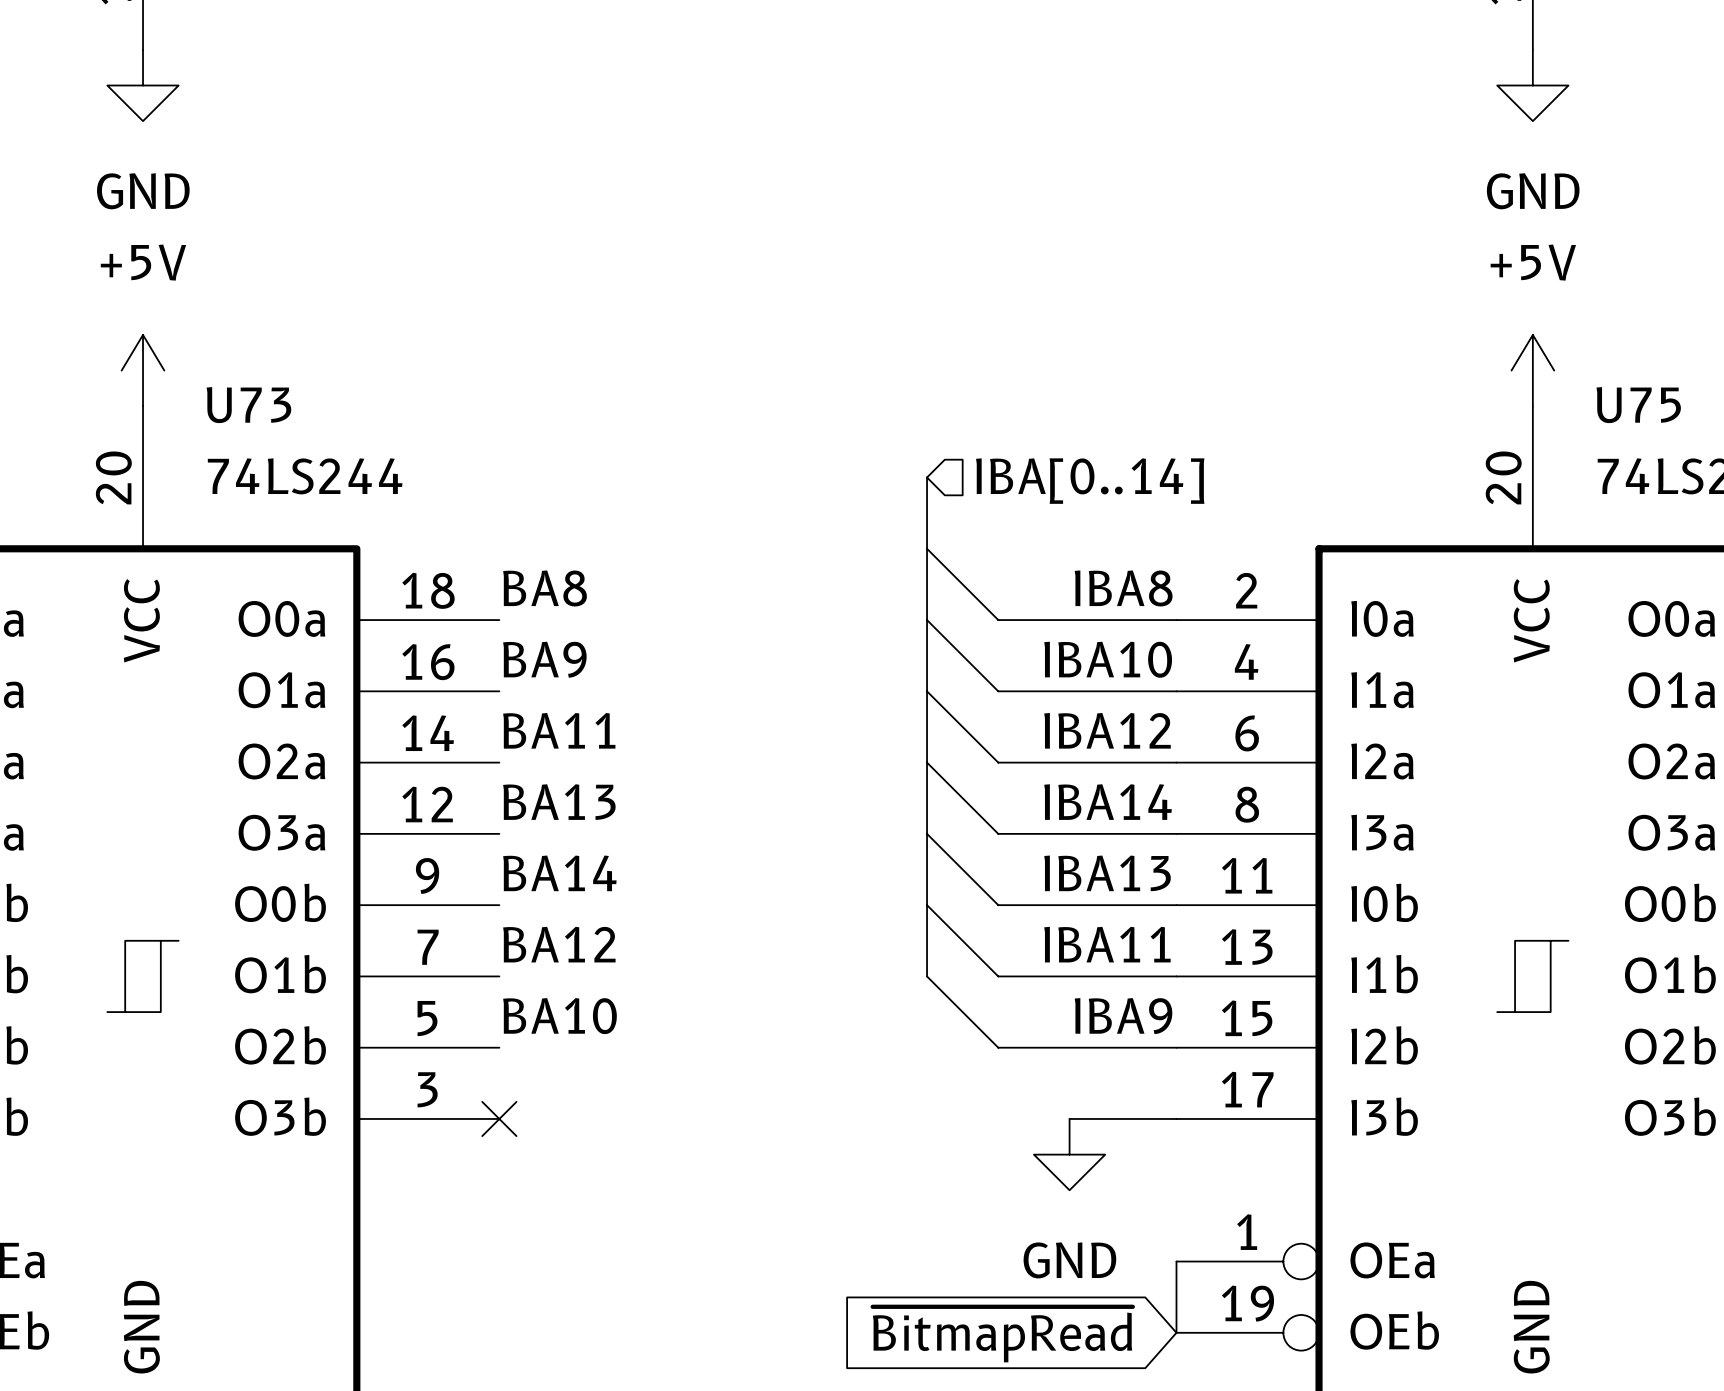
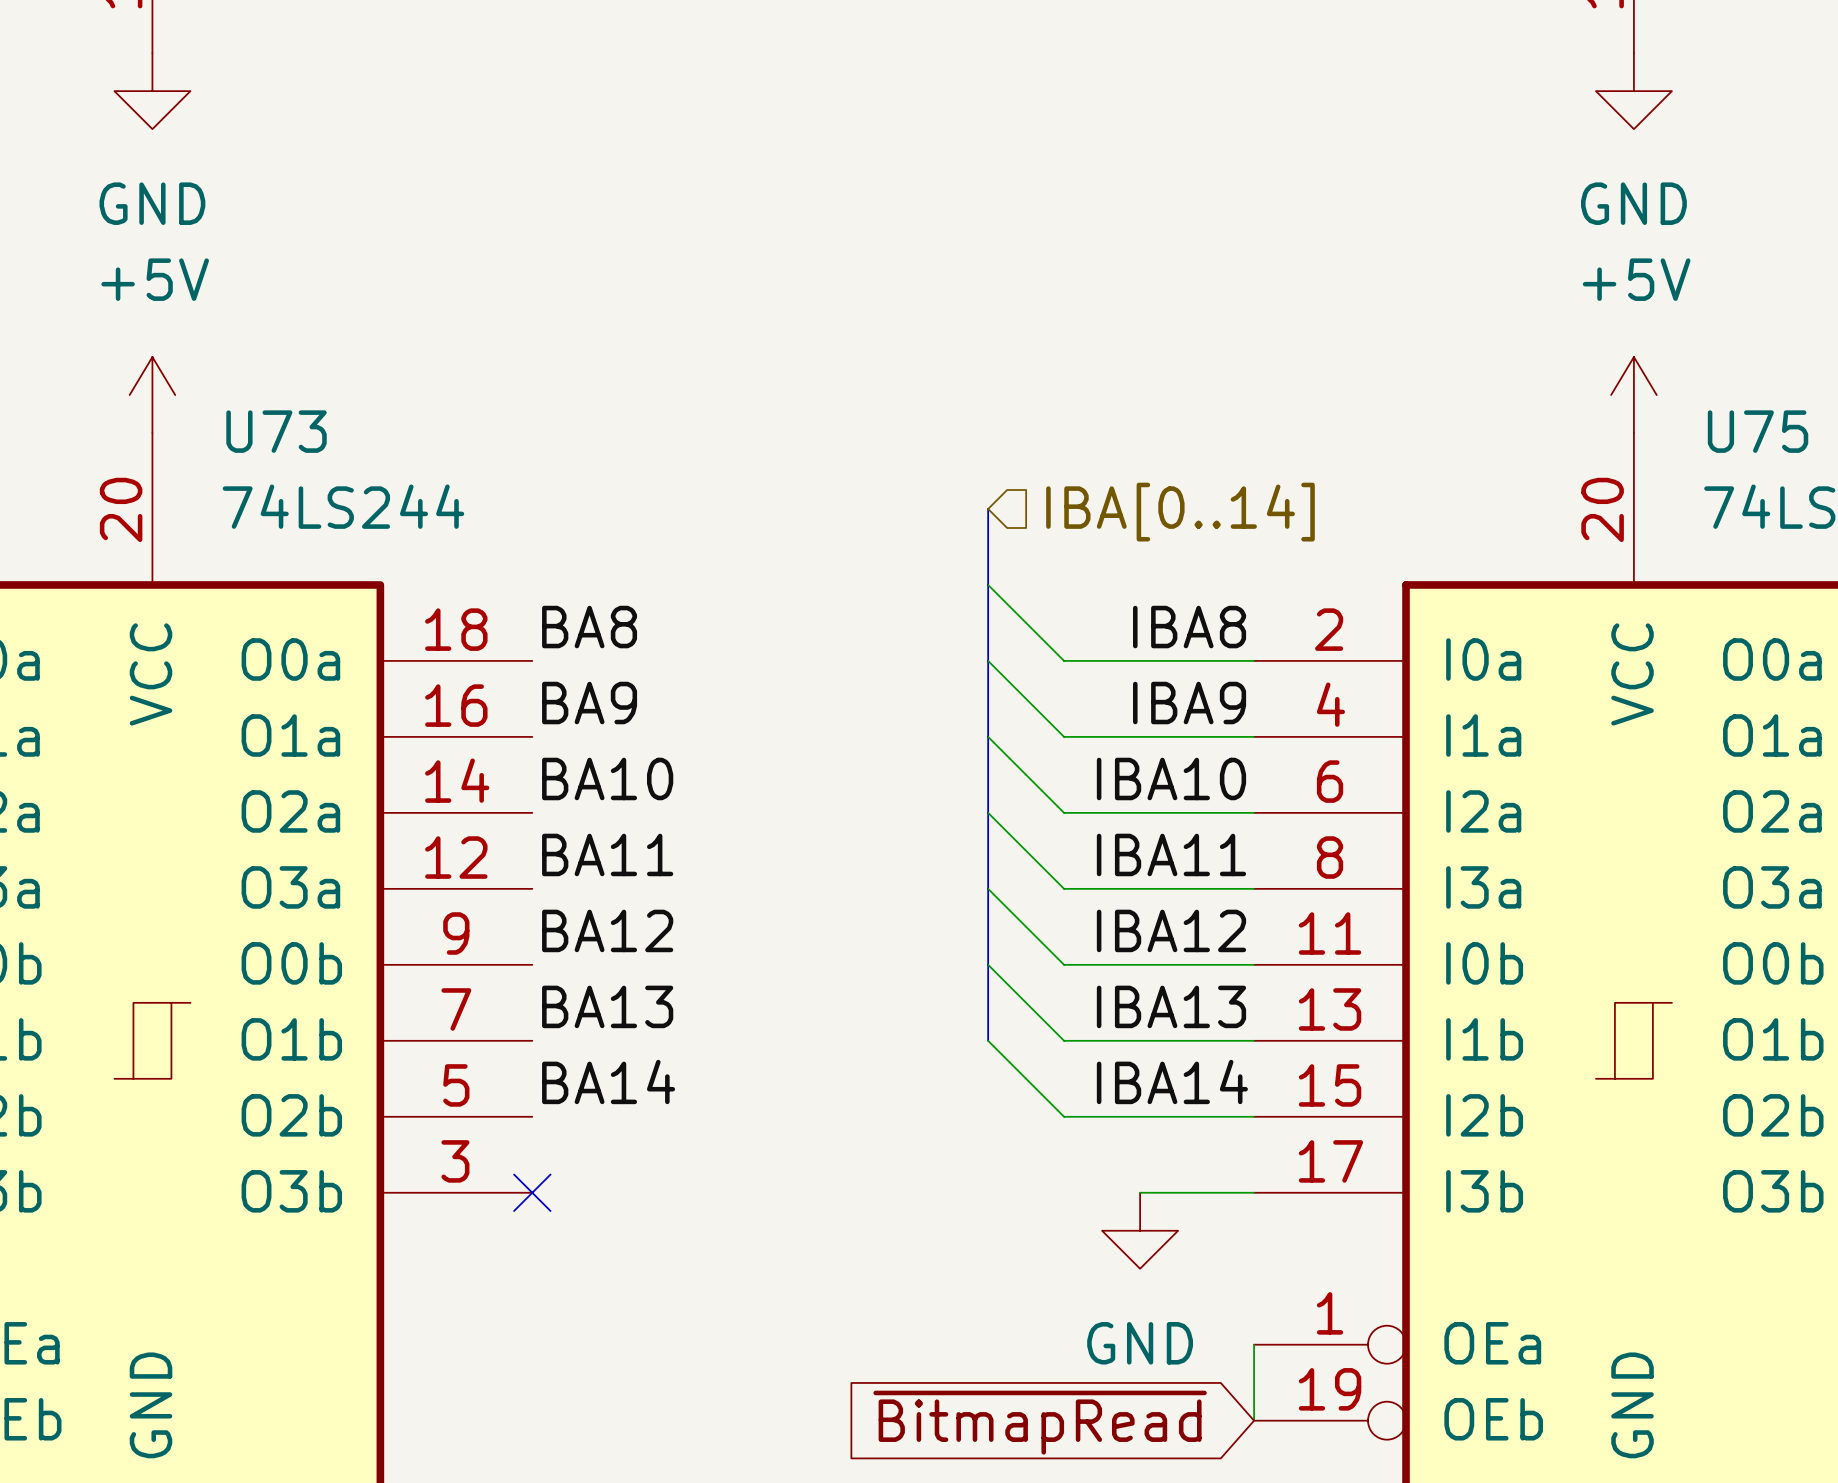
label: IBA10 (1108, 659) -> IBA9 (1189, 703)
label: BA11 (559, 730) -> BA10 (607, 778)
label: IBA12 (1107, 730) -> IBA10 (1171, 778)
label: BA13 (559, 802) -> BA11 (607, 854)
label: IBA14 (1108, 802) -> IBA11 (1171, 854)
label: BA14 (559, 873) -> BA12 (607, 930)
label: IBA13 (1107, 873) -> IBA12 (1171, 930)
label: BA12 (559, 944) -> BA13 (607, 1006)
label: IBA11 (1107, 944) -> IBA13 (1171, 1006)
label: BA10 (559, 1016) -> BA14 (608, 1081)
label: IBA9 (1123, 1016) -> IBA14 (1172, 1081)

